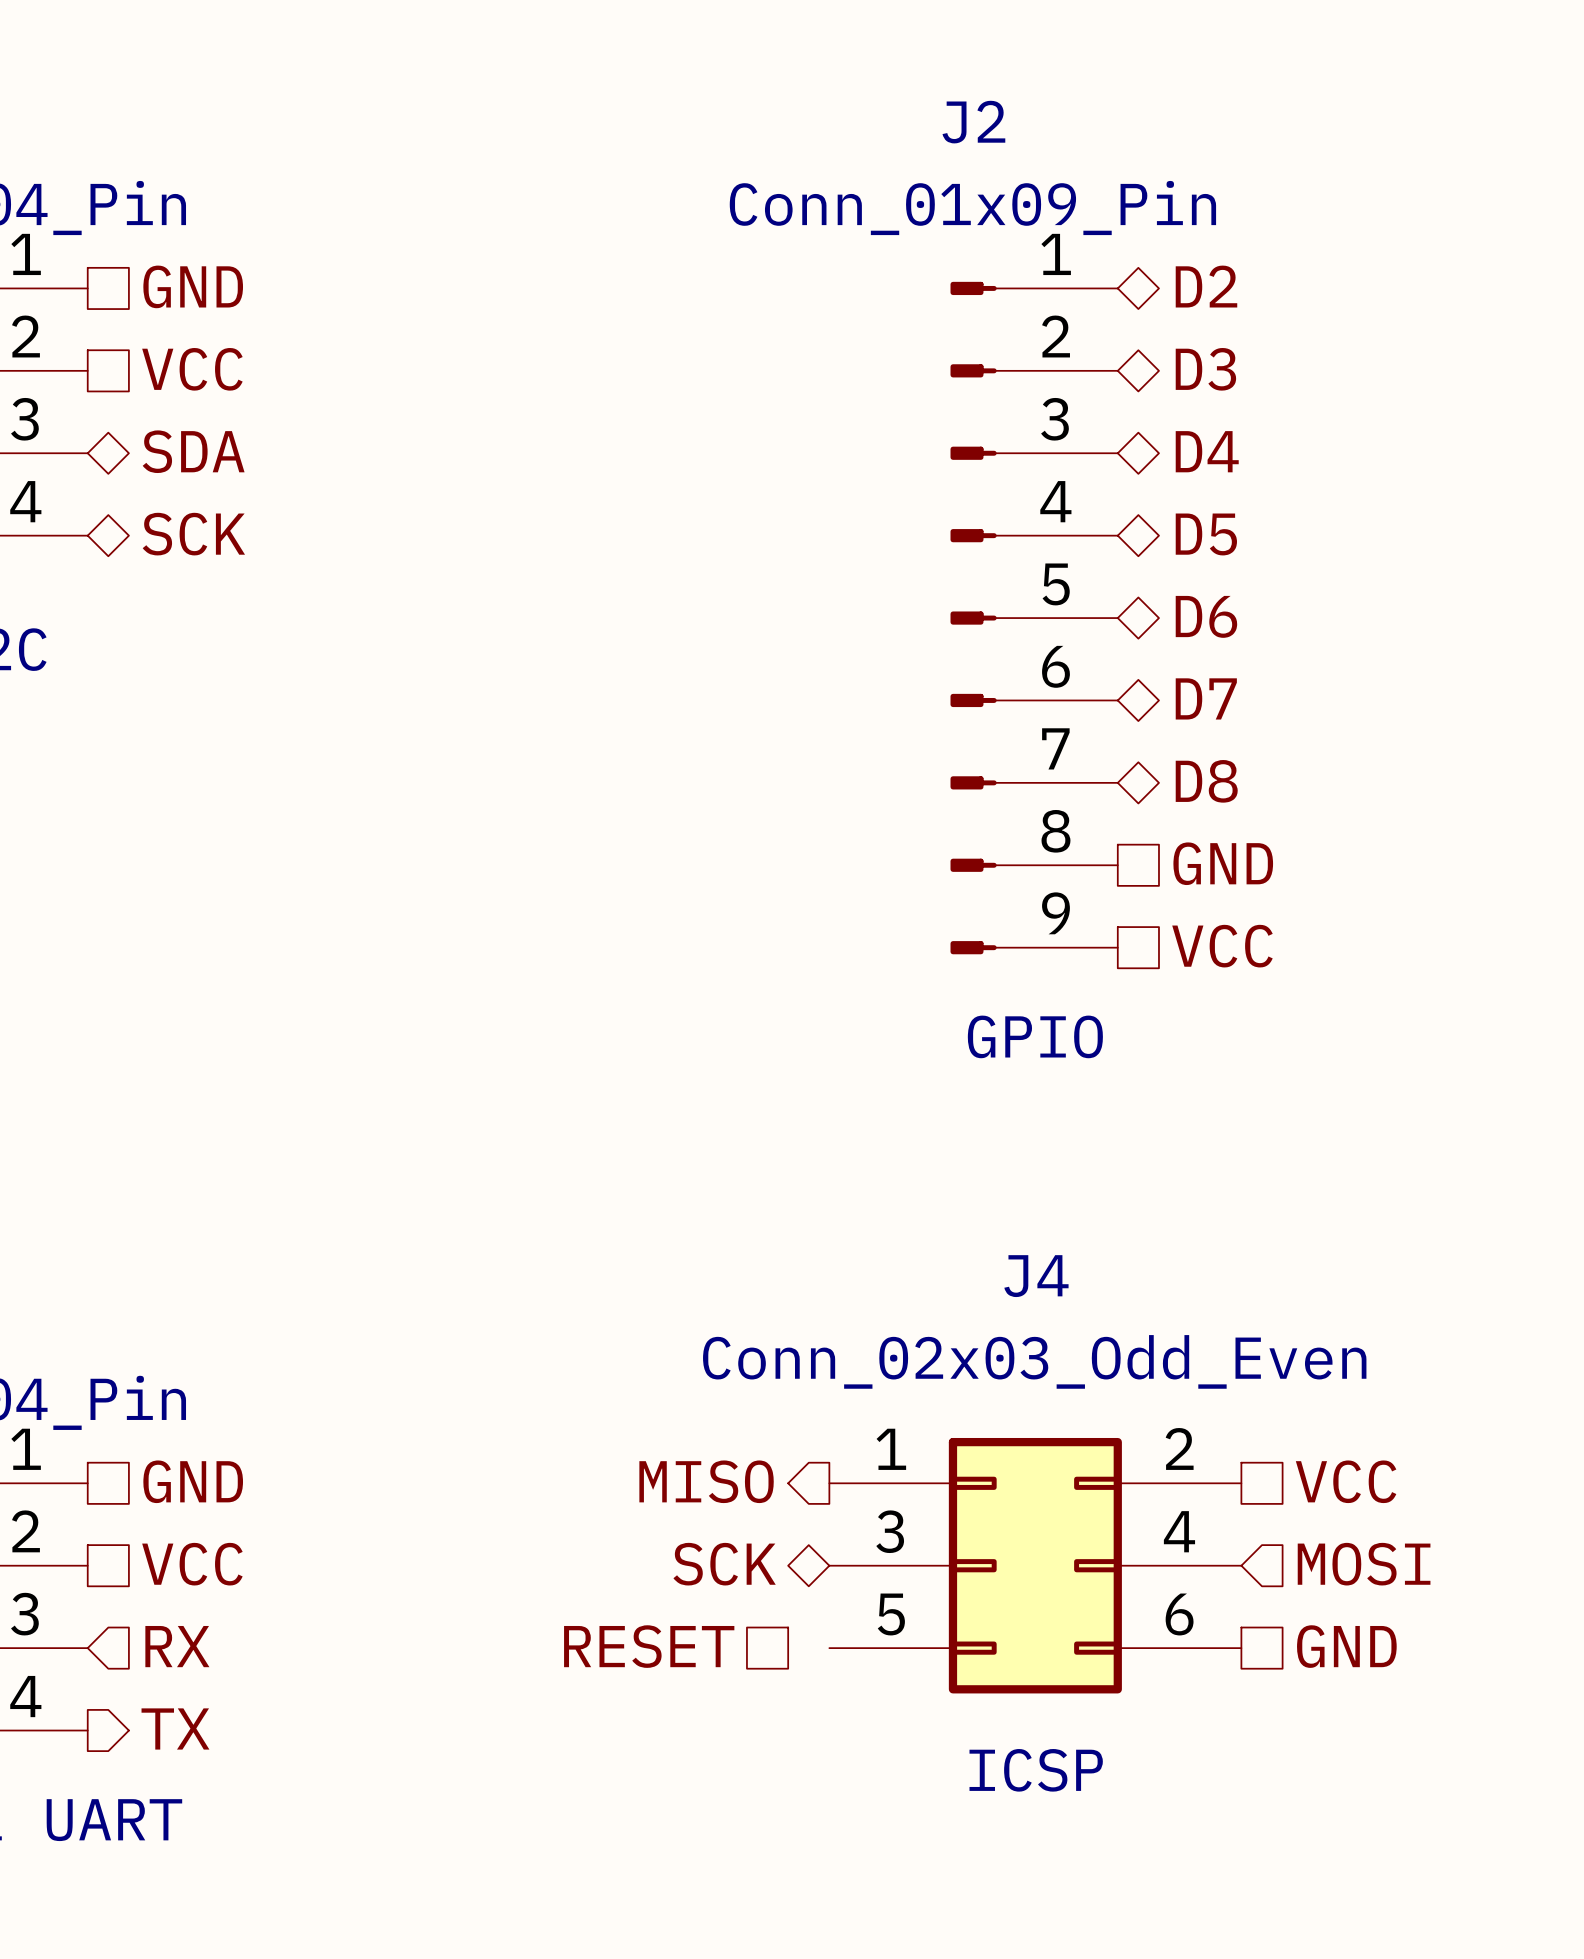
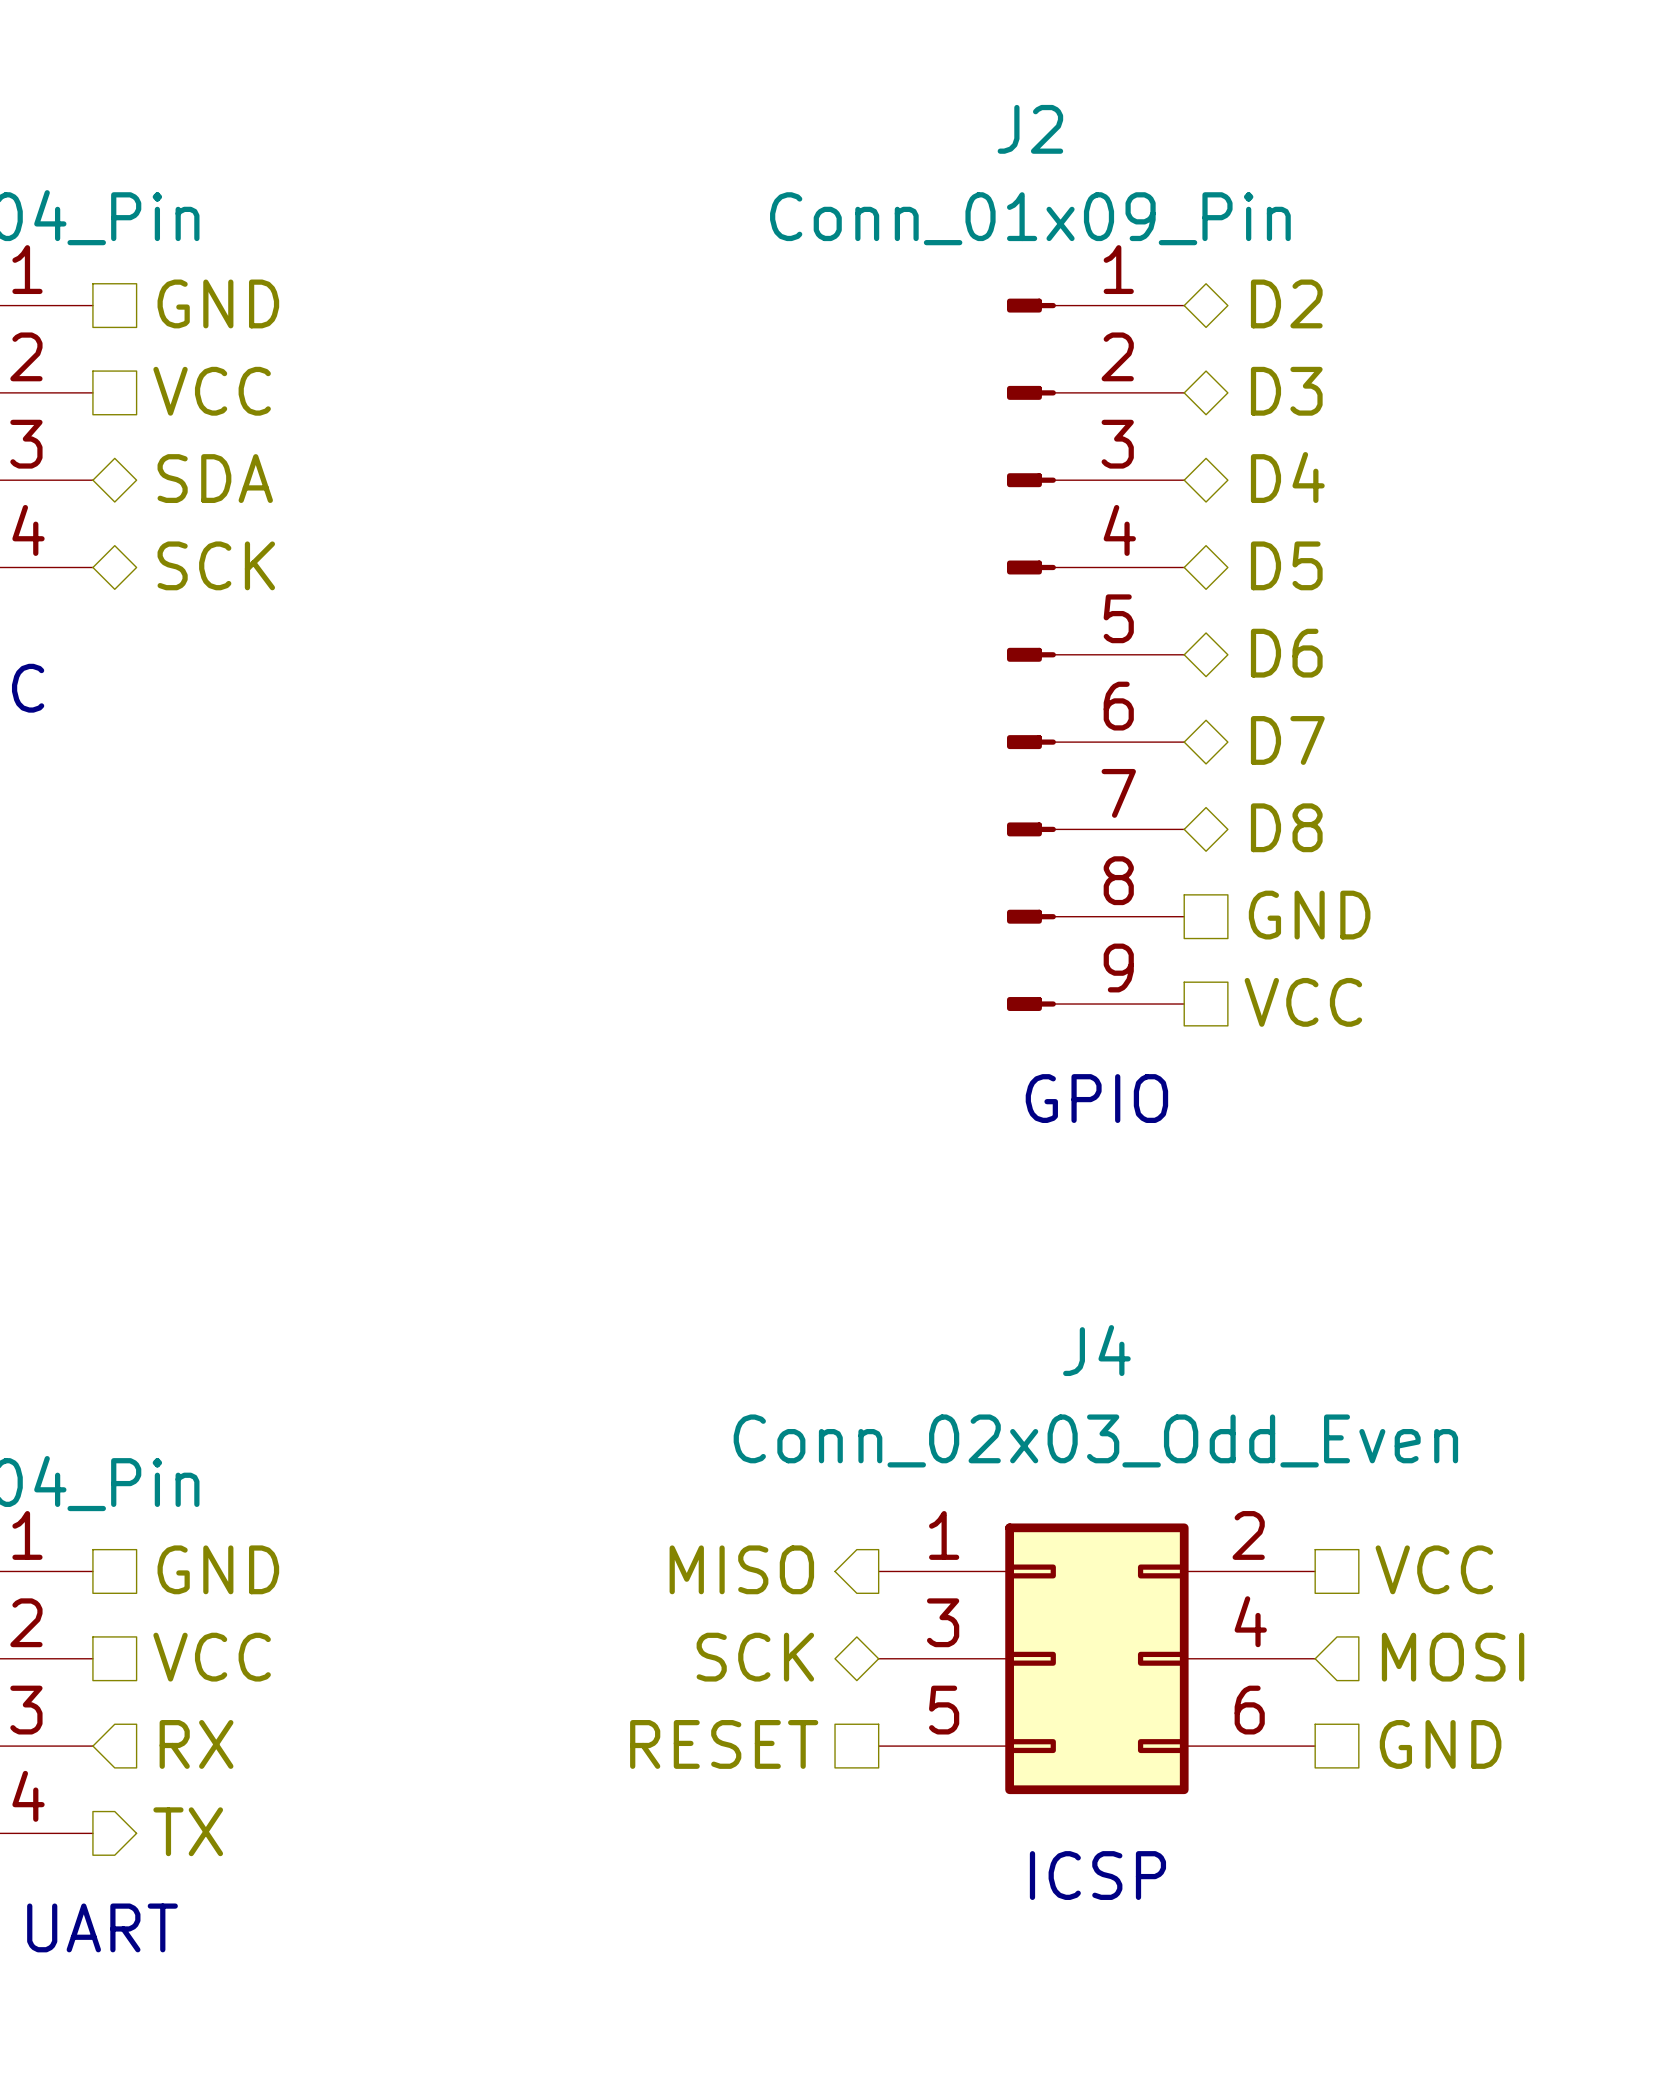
hierarchical label position: RESET (649, 1646) -> RESET (724, 1744)

